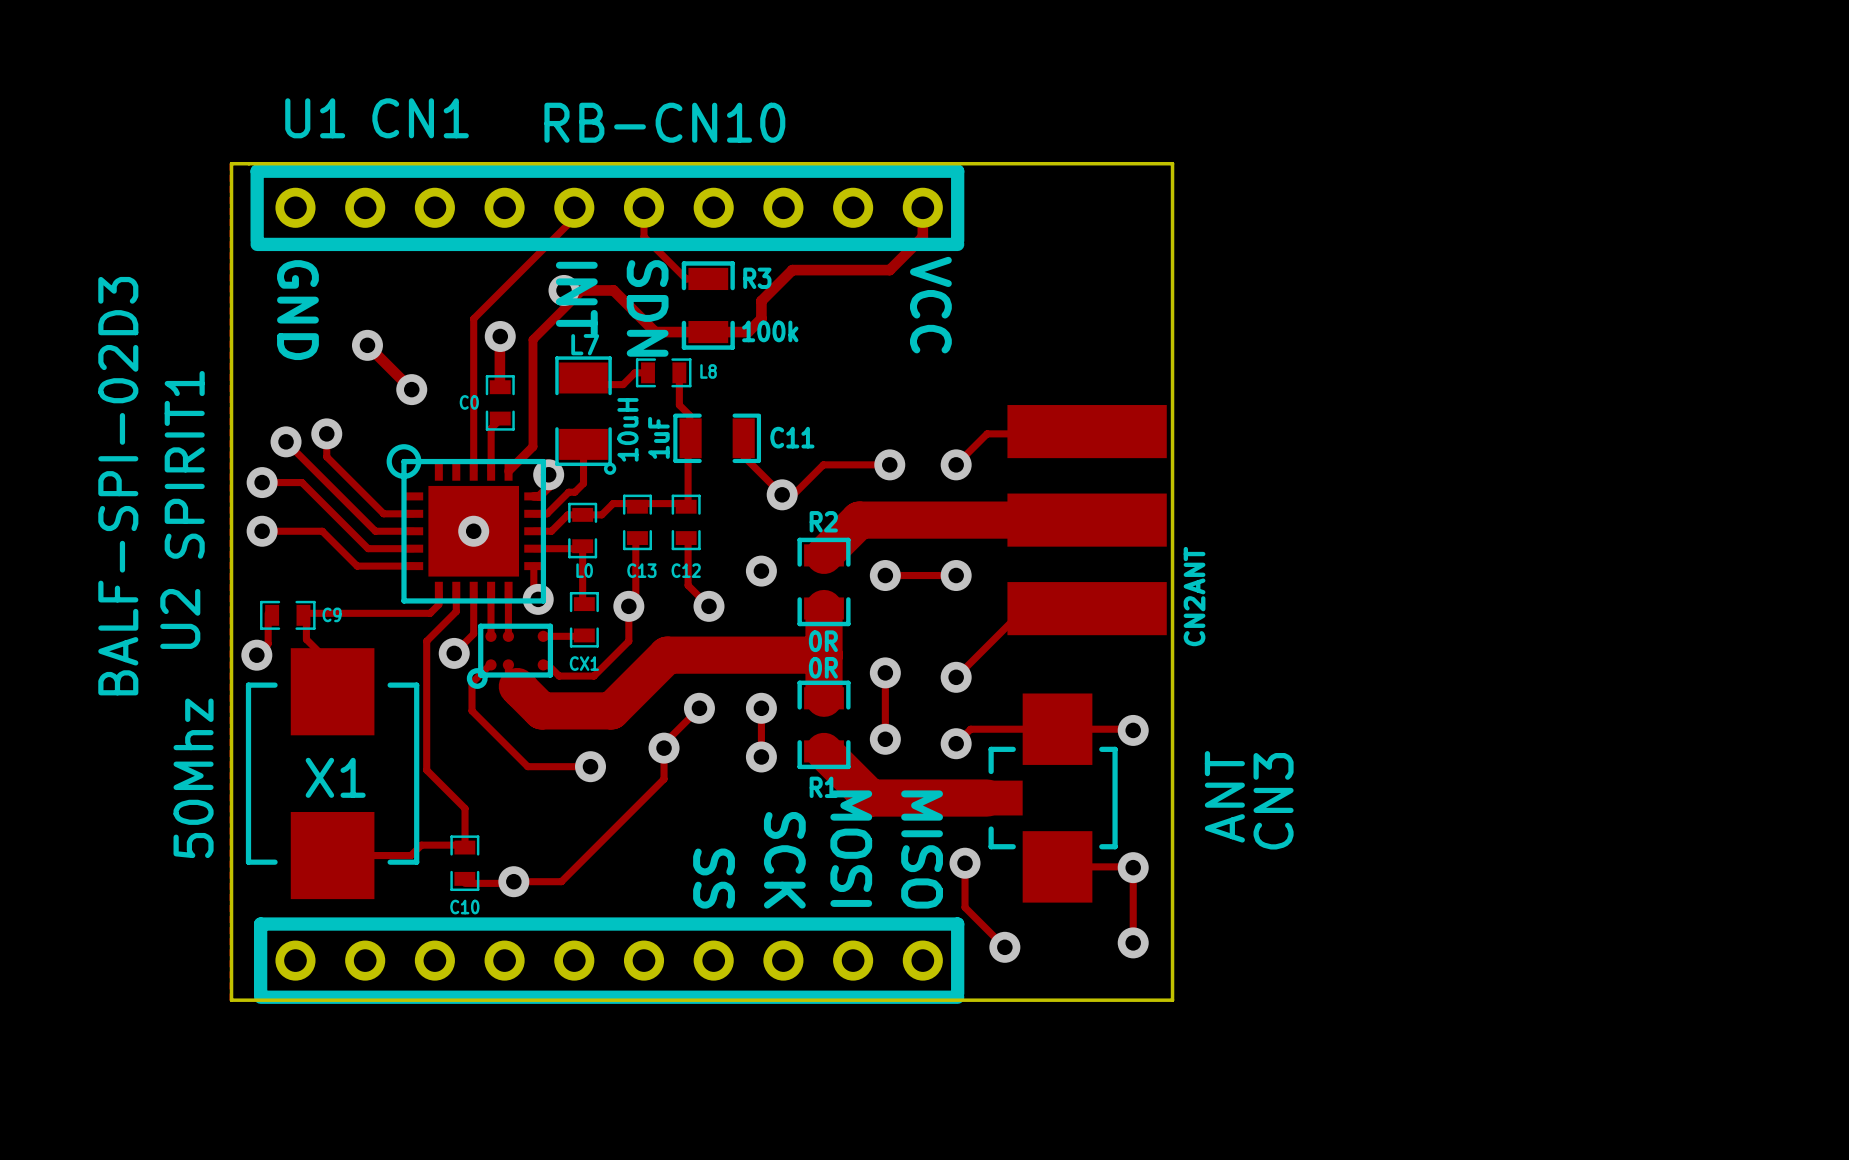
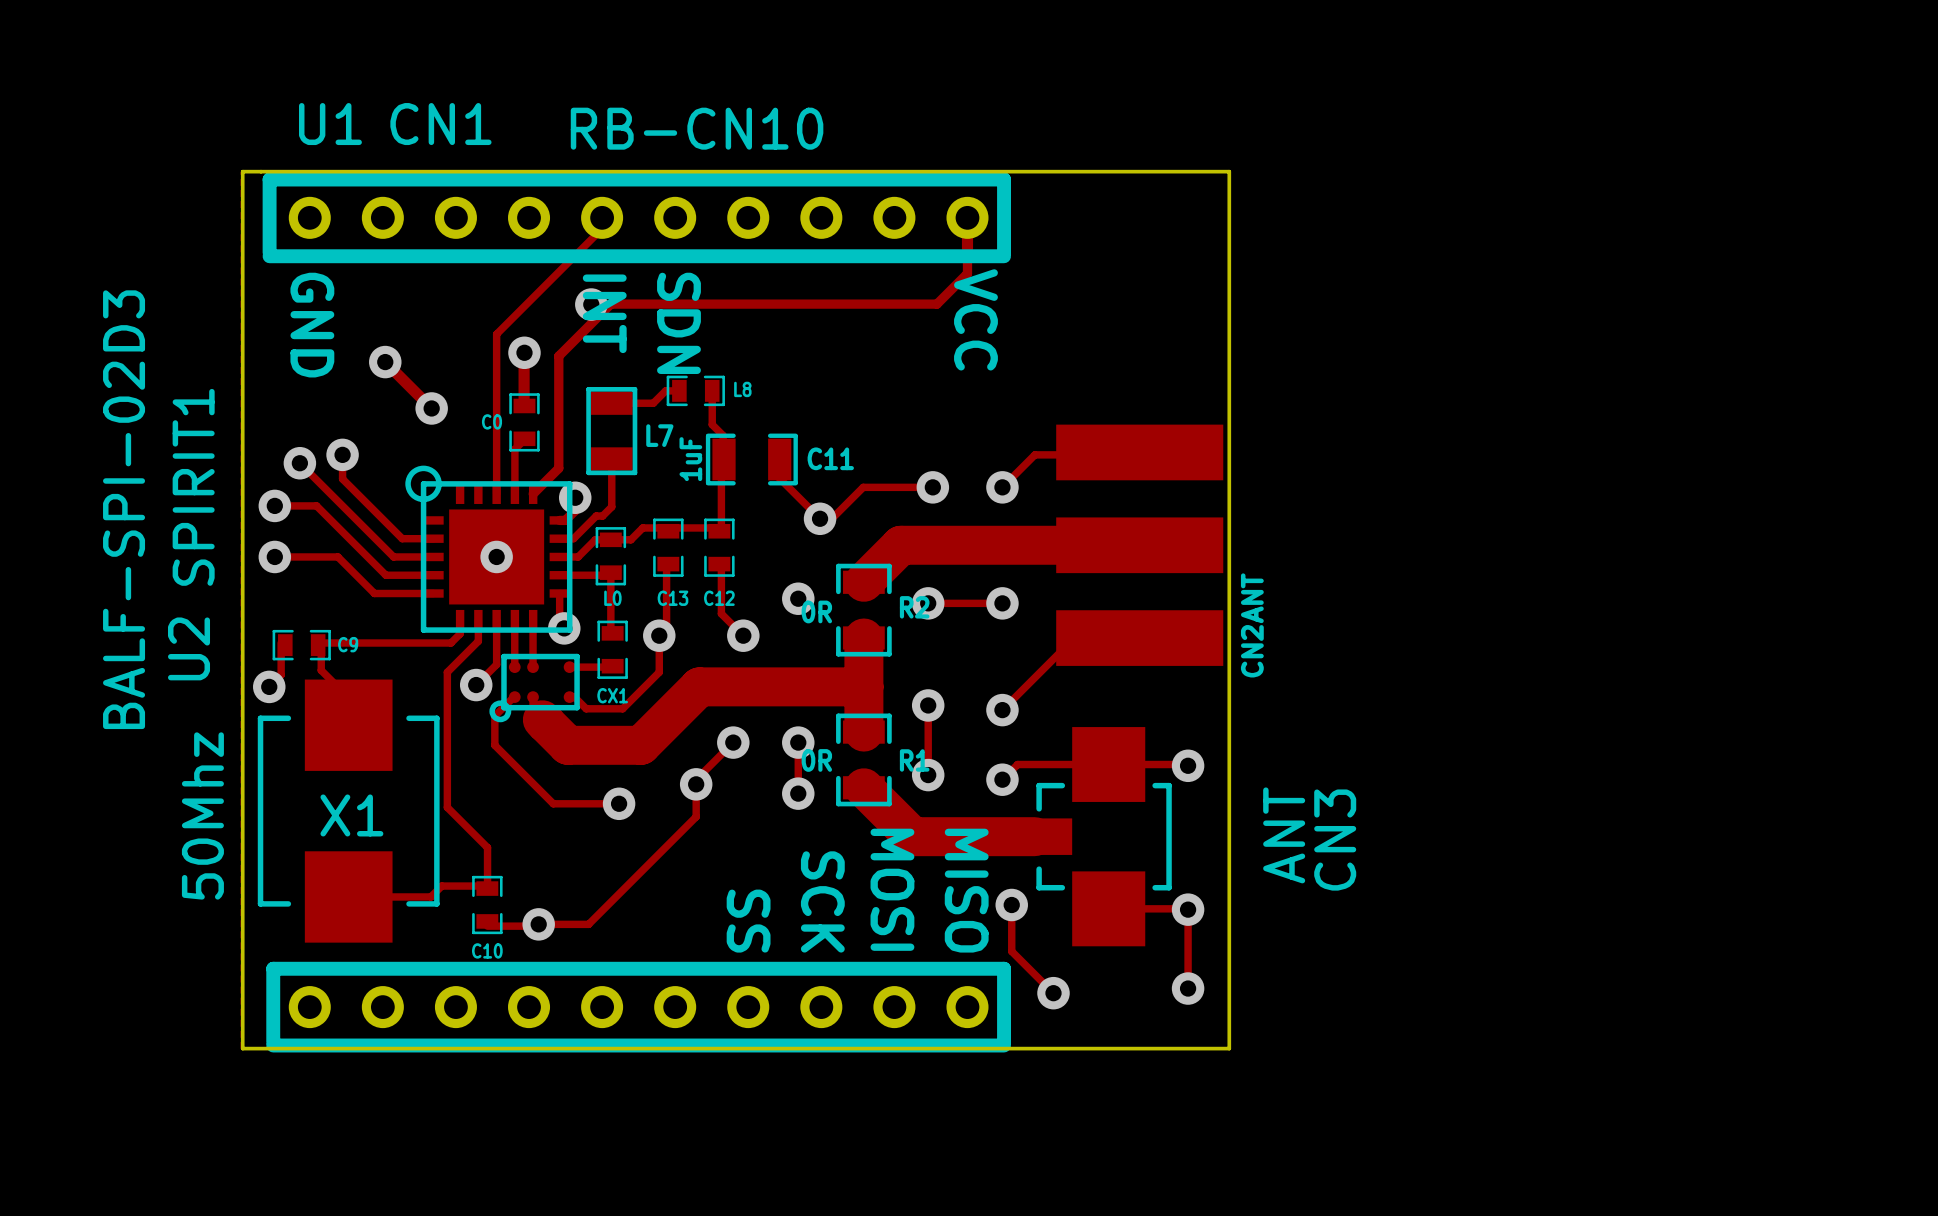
track: (644, 207) (644, 236) (686, 278) (708, 278) -> none
track: (922, 237) (889, 270) (792, 270) (761, 301) (761, 318) (748, 332) (655, 332) (613, 290) (564, 290) -> (967, 248) (967, 273) (936, 304) (610, 304)
R3: 100k (708, 305) -> none
L7 name position: L7 (585, 344) -> L7 (659, 435)
L7 footprint: [555, 356, 617, 475] -> [586, 387, 638, 476]
L7 value: 10uH (627, 429) -> none
R2 name position: R2 (823, 521) -> R2 (914, 607)
R2 value position: 0R (823, 641) -> 0R (816, 611)
R1 value position: 0R (823, 667) -> 0R (816, 760)
R1 name position: R1 (823, 787) -> R1 (914, 760)

